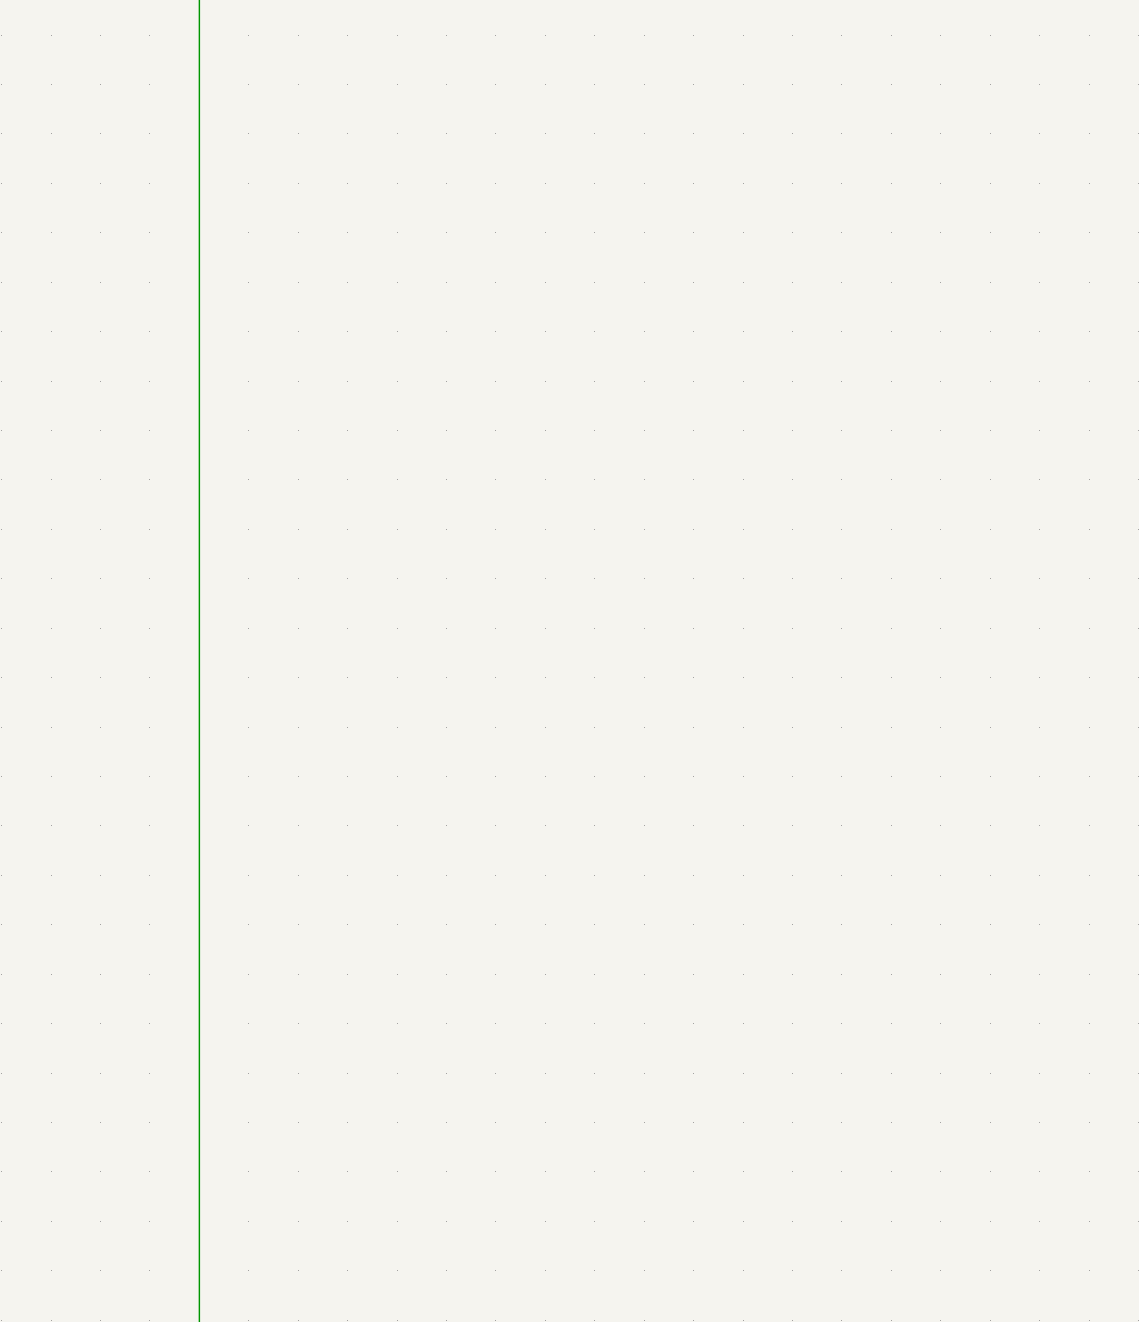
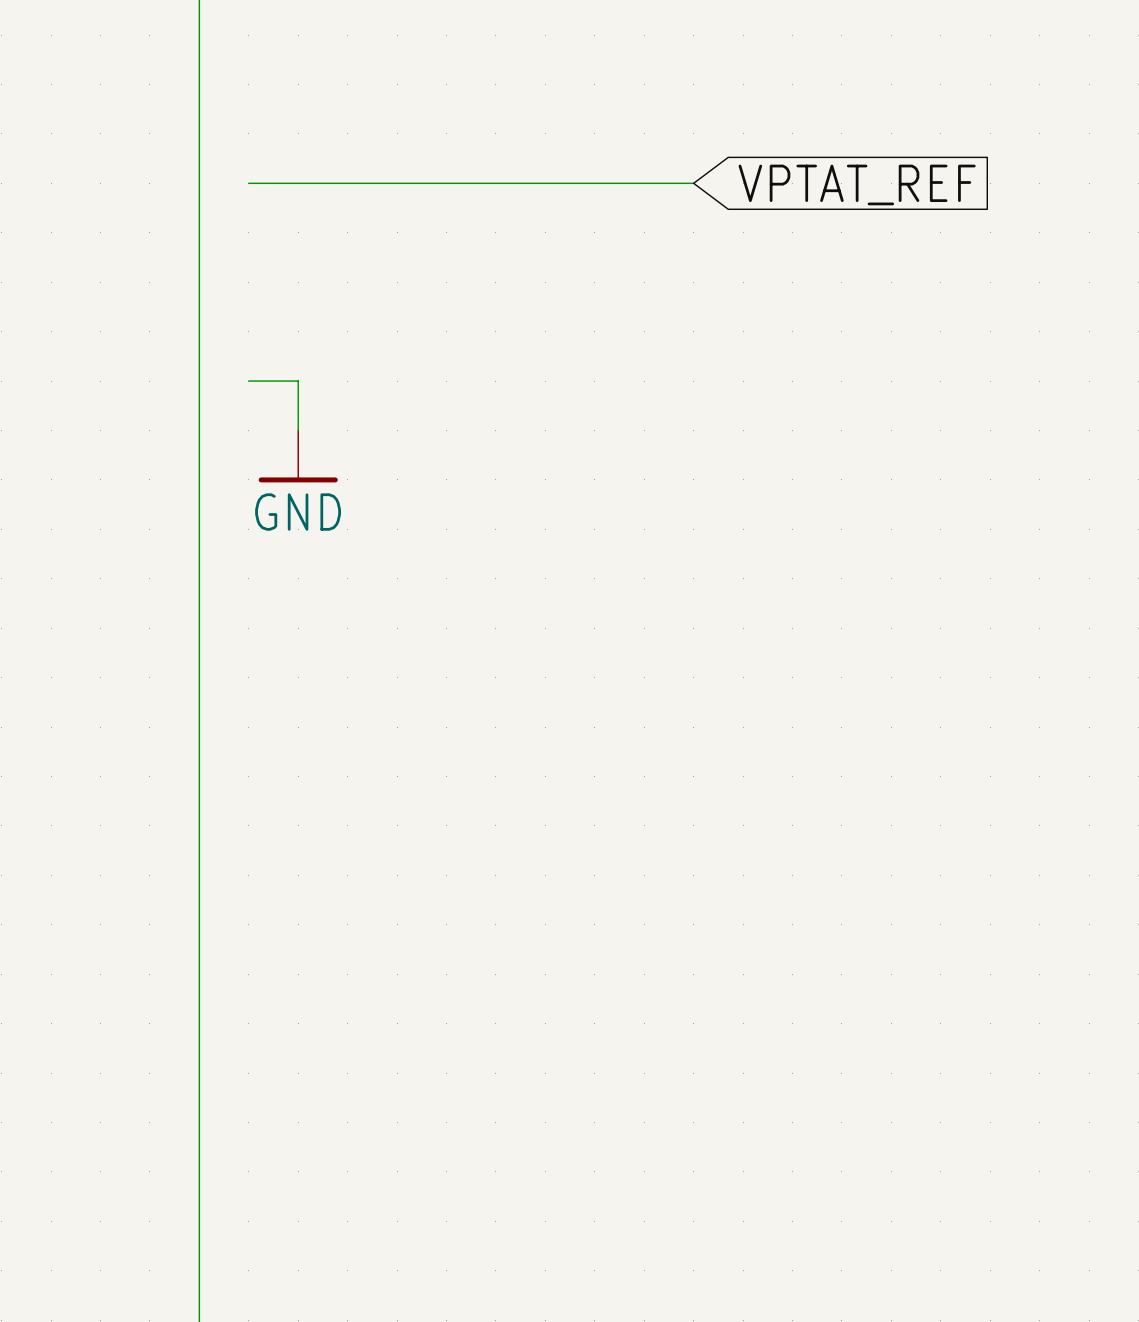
wire: none -> (248, 183) (693, 183)
global label: none -> VPTAT_REF (857, 184)
wire: none -> (248, 381) (298, 381) (298, 430)
power symbol: none -> GND (298, 456)

